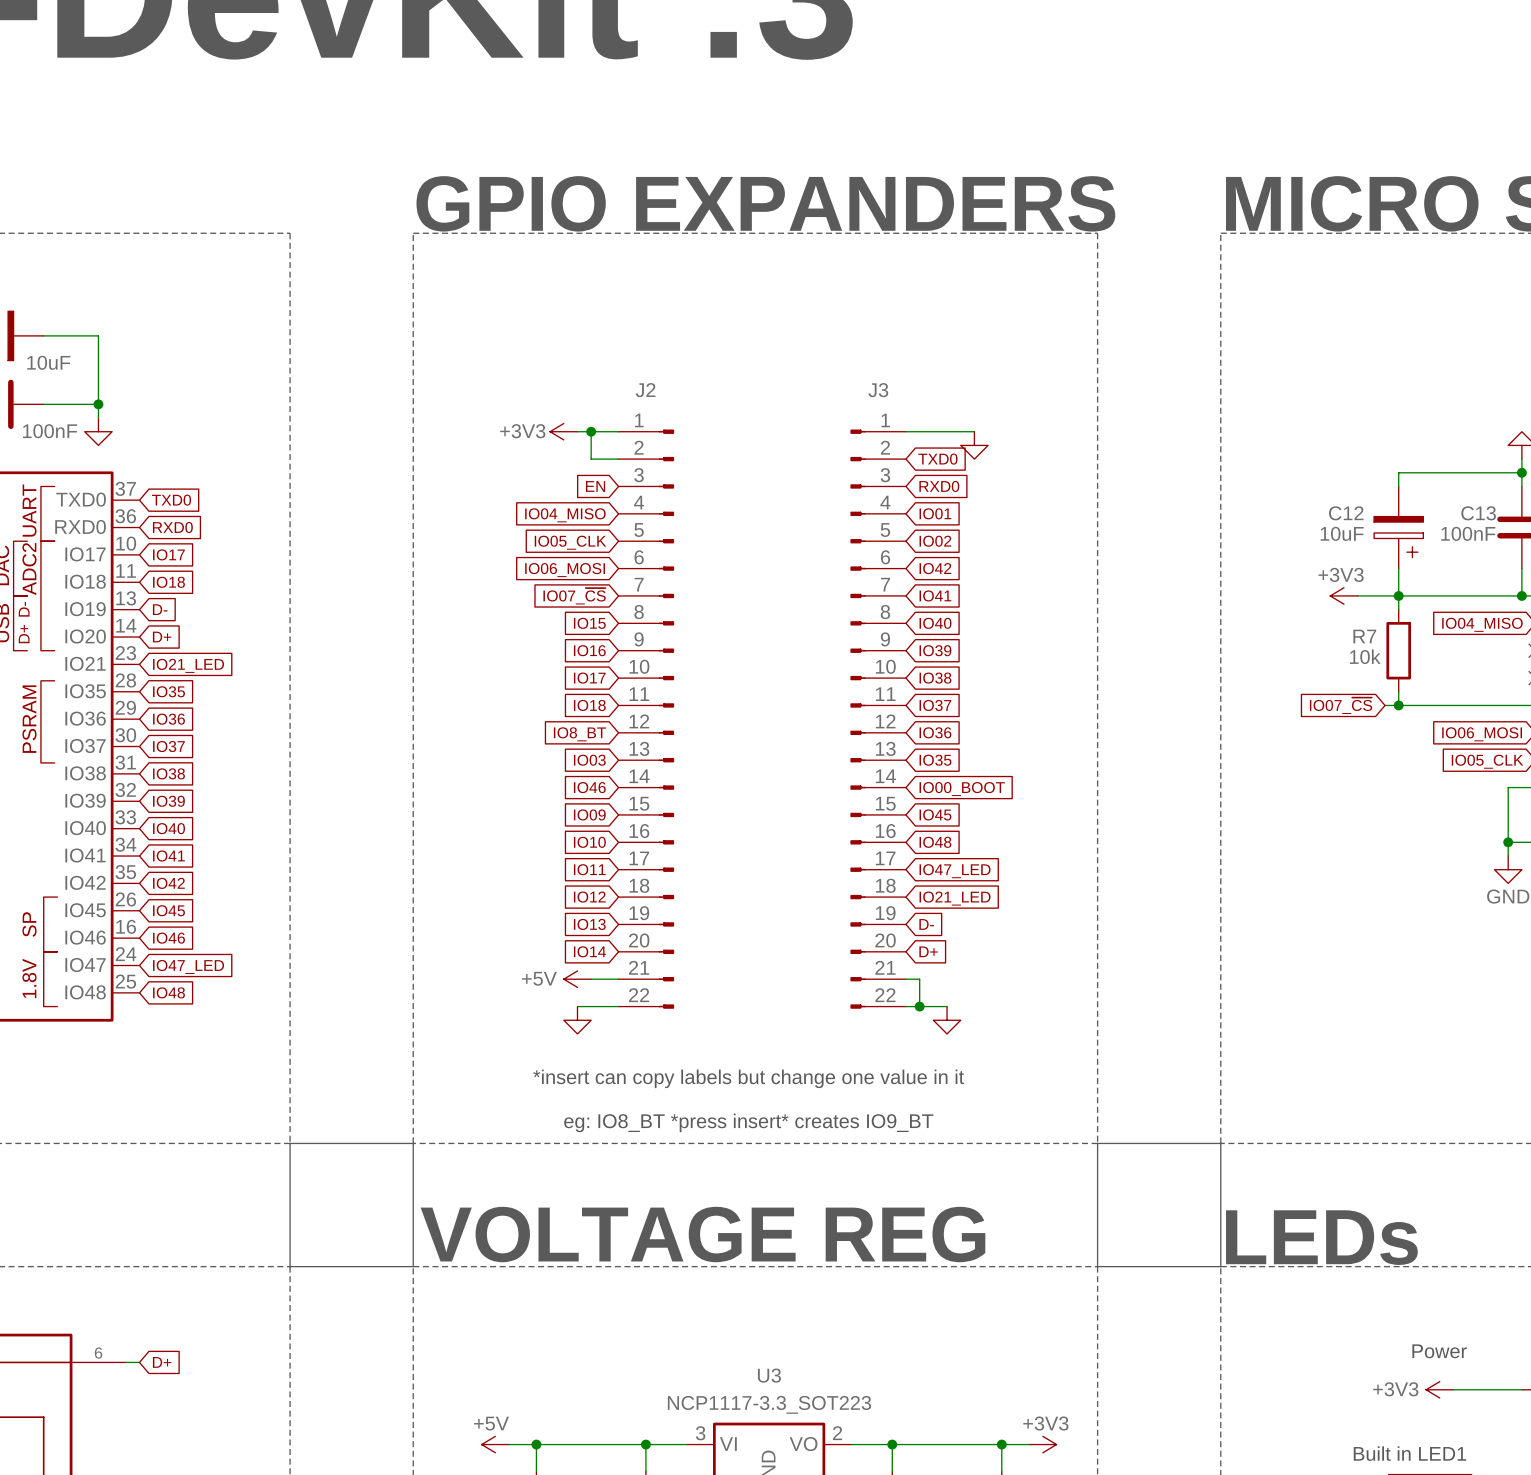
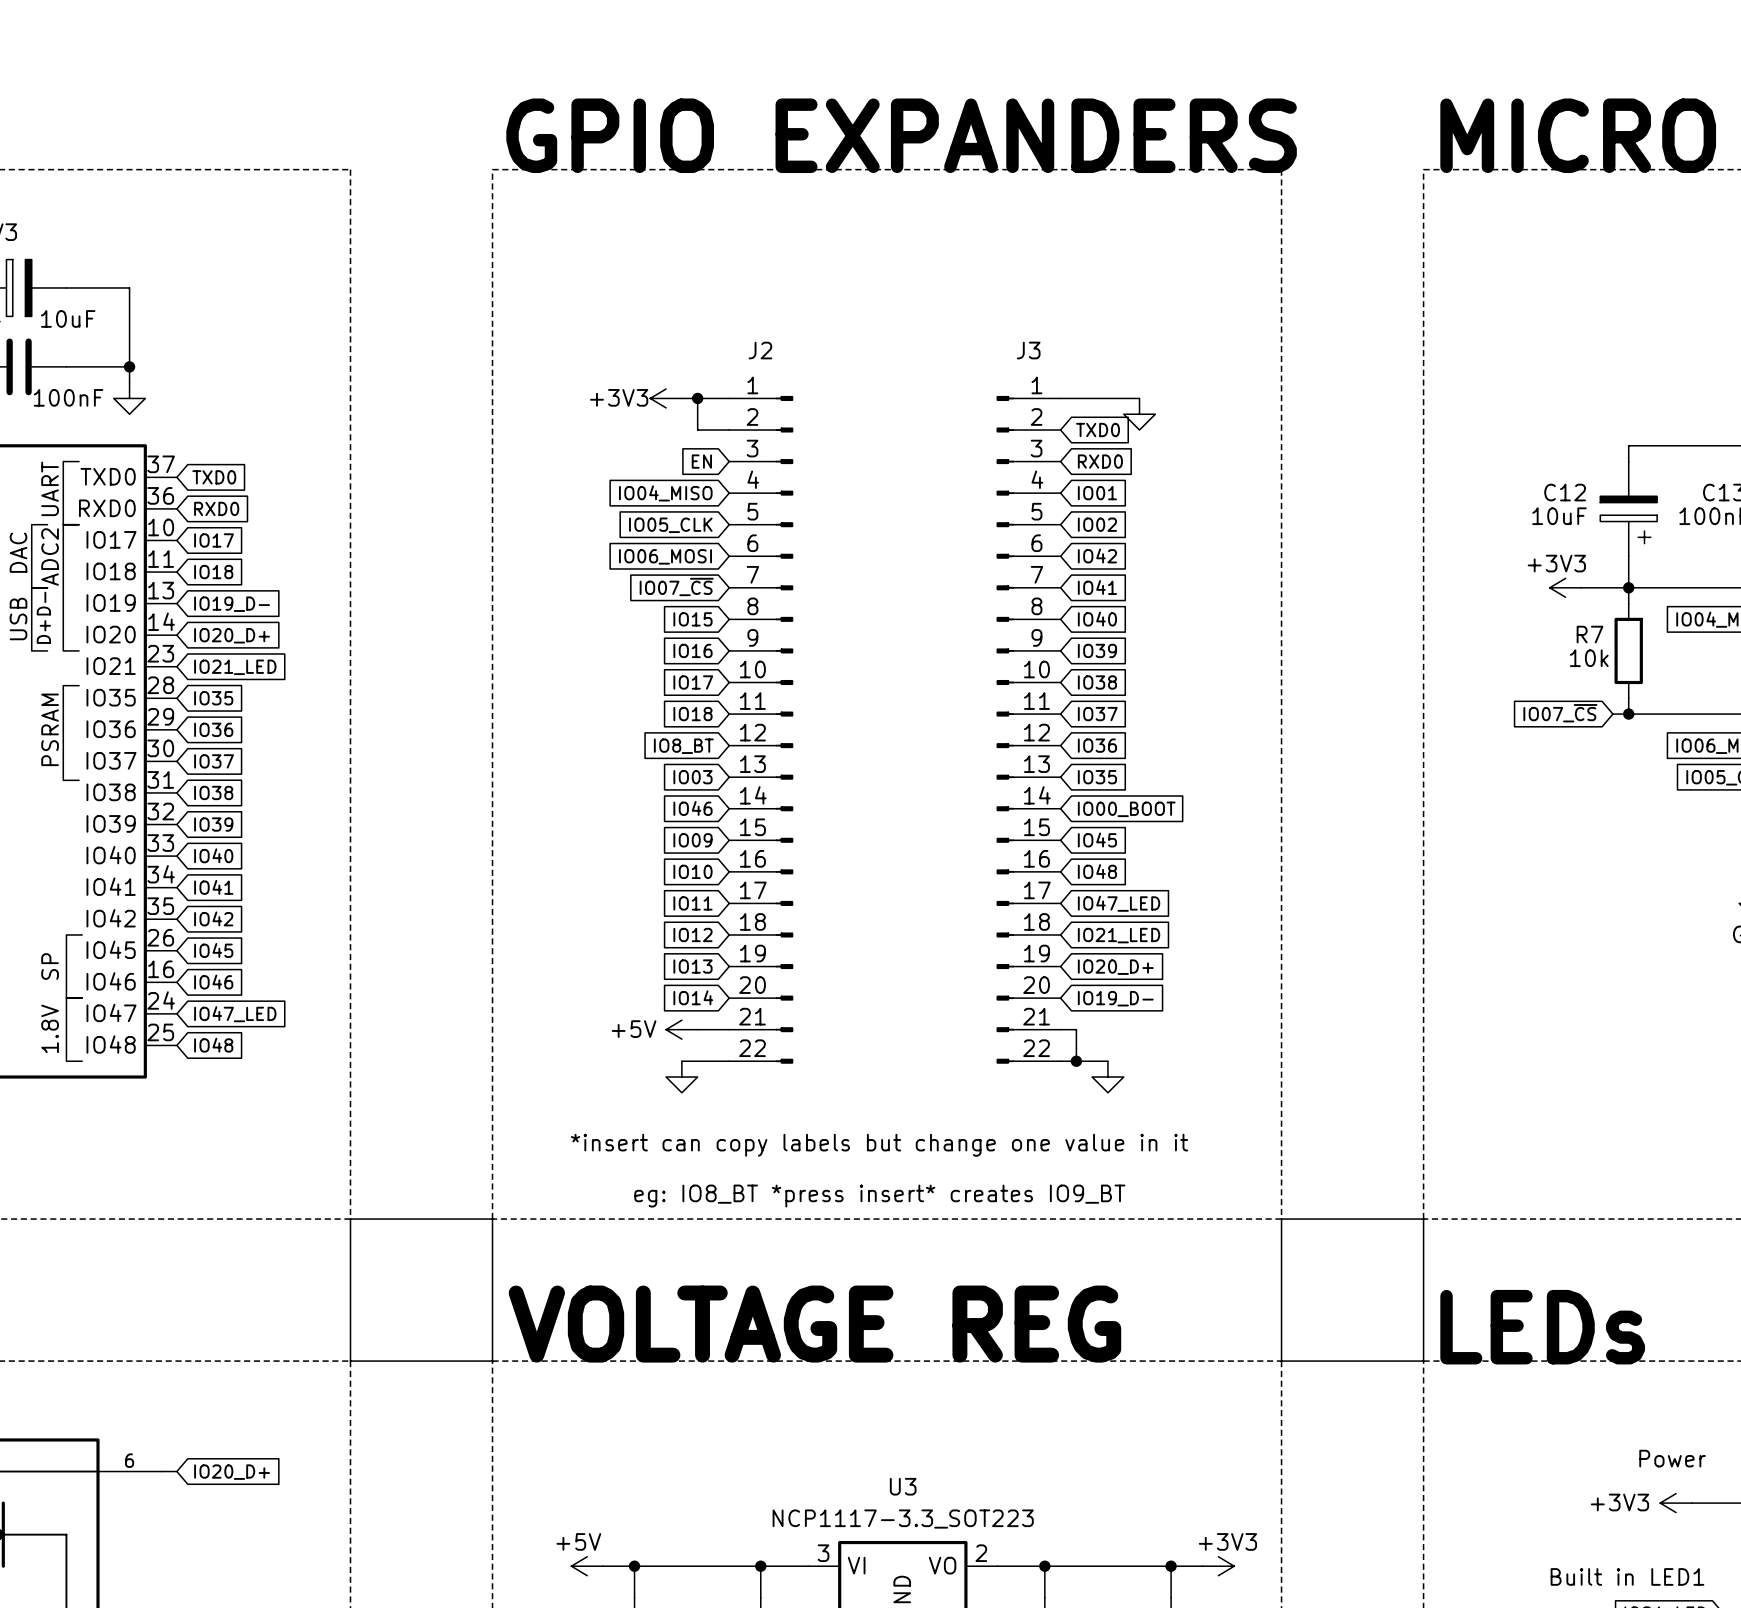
global label: D- (160, 609) -> IO19_D- (232, 604)
global label: D+ (162, 637) -> IO20_D+ (232, 635)
global label: D- (926, 924) -> IO20_D+ (1115, 967)
global label: D+ (928, 951) -> IO19_D- (1115, 998)
global label: D+ (162, 1362) -> IO20_D+ (232, 1472)

